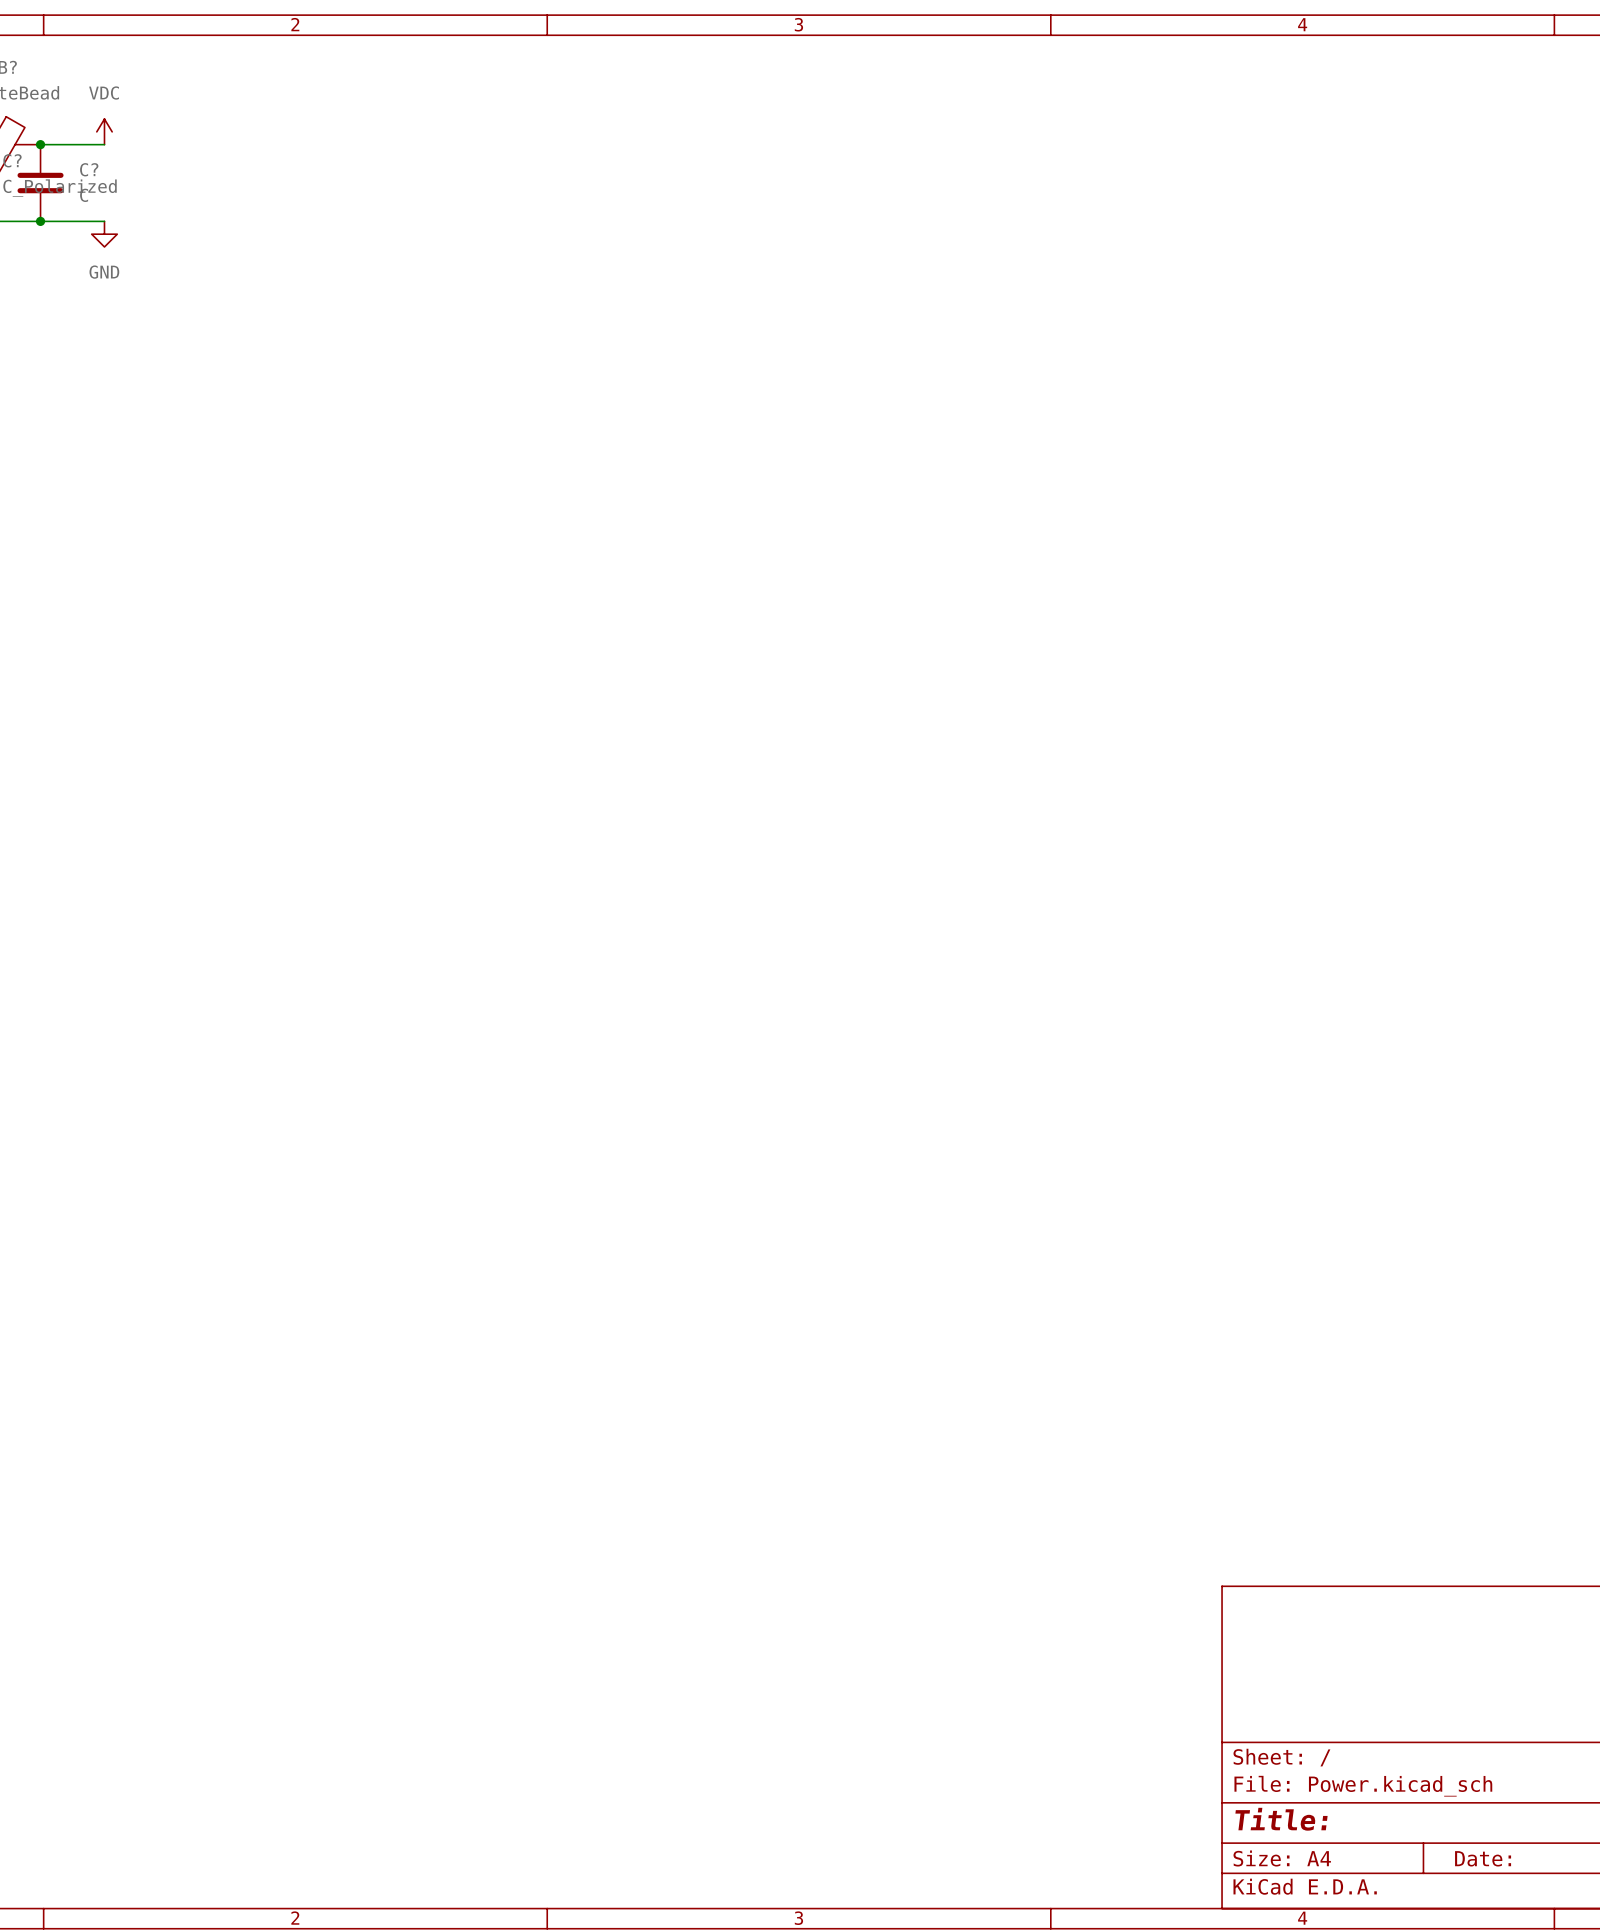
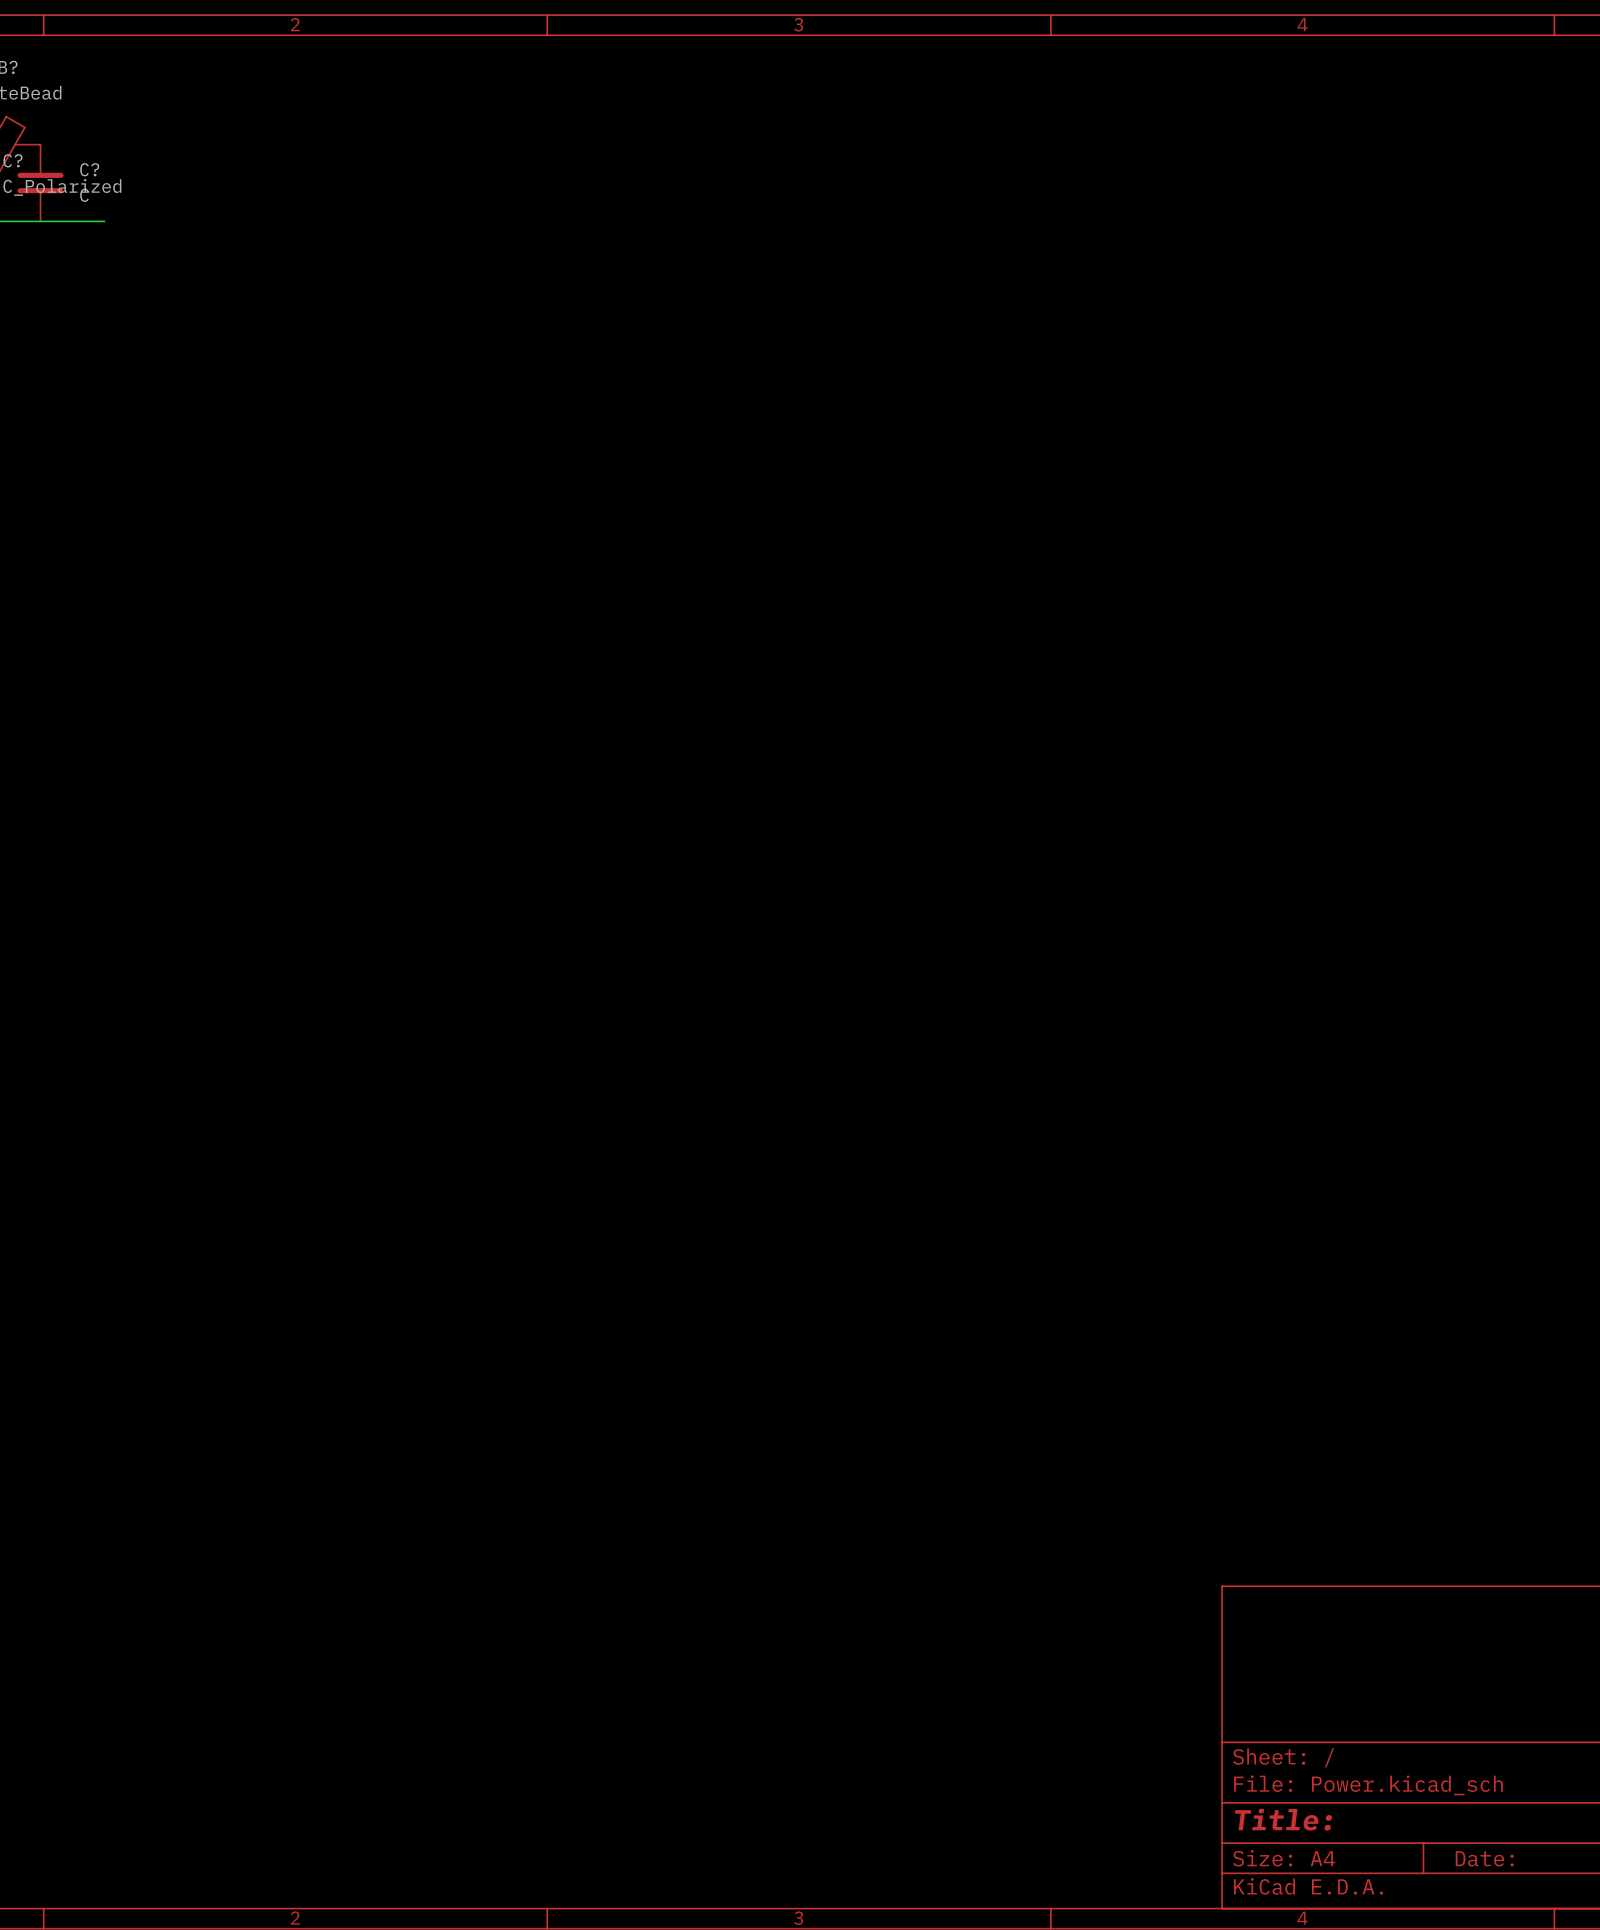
power symbol: VDC (104, 131) -> none
wire: (40, 144) (104, 144) -> none
junction: (40, 144) -> none
junction: (40, 221) -> none
power symbol: GND (104, 234) -> none

